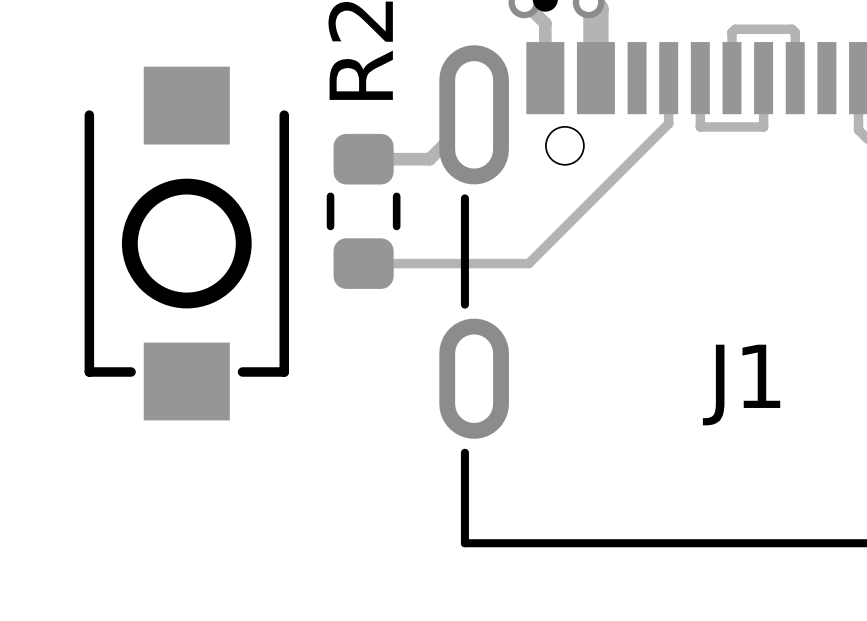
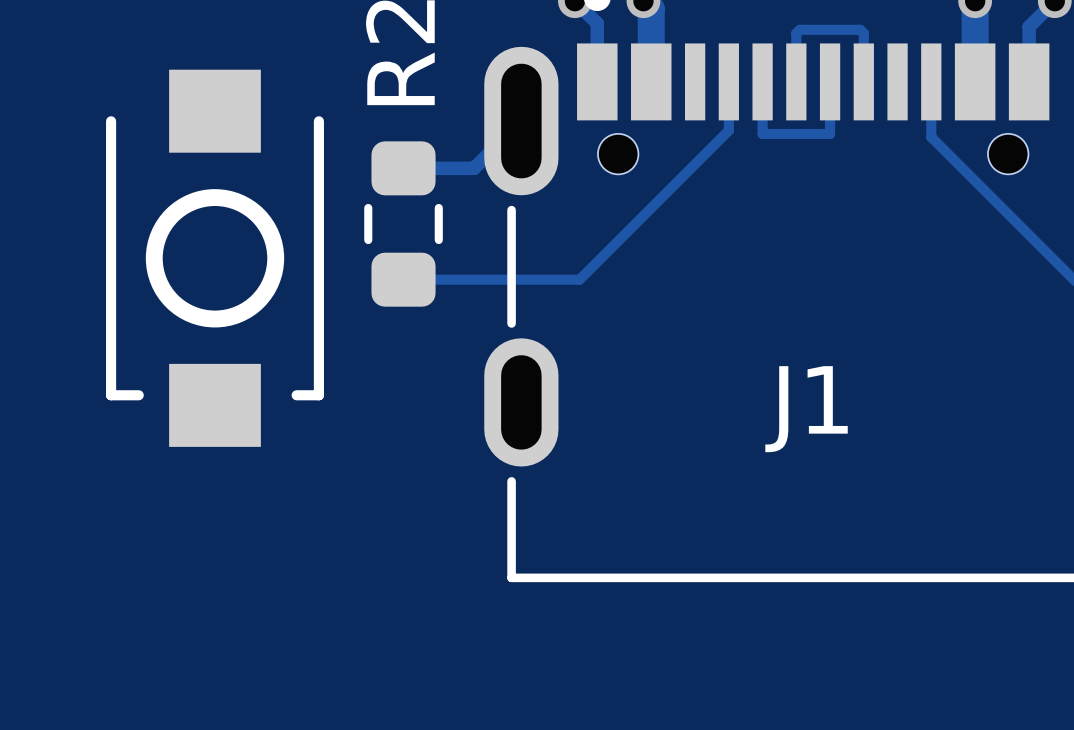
part footprint: [84, 66, 289, 421] -> [106, 69, 324, 447]

